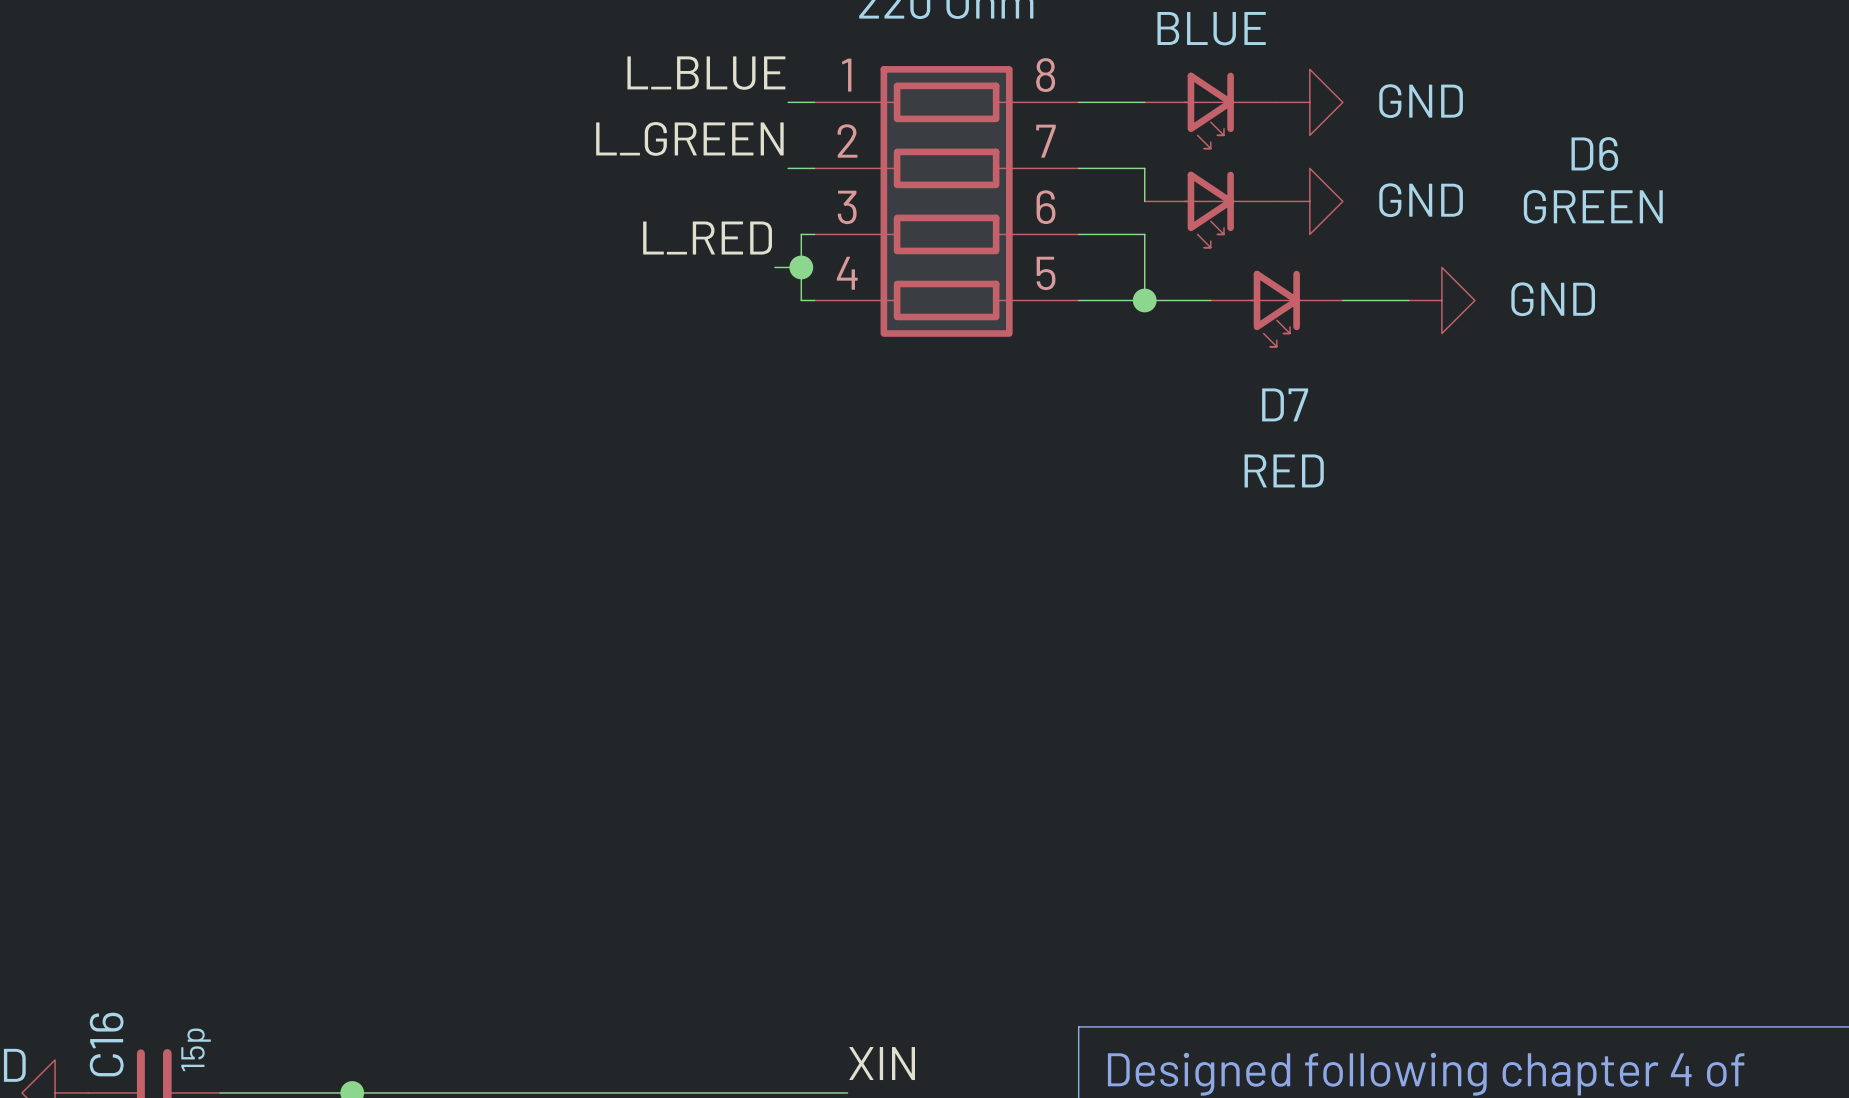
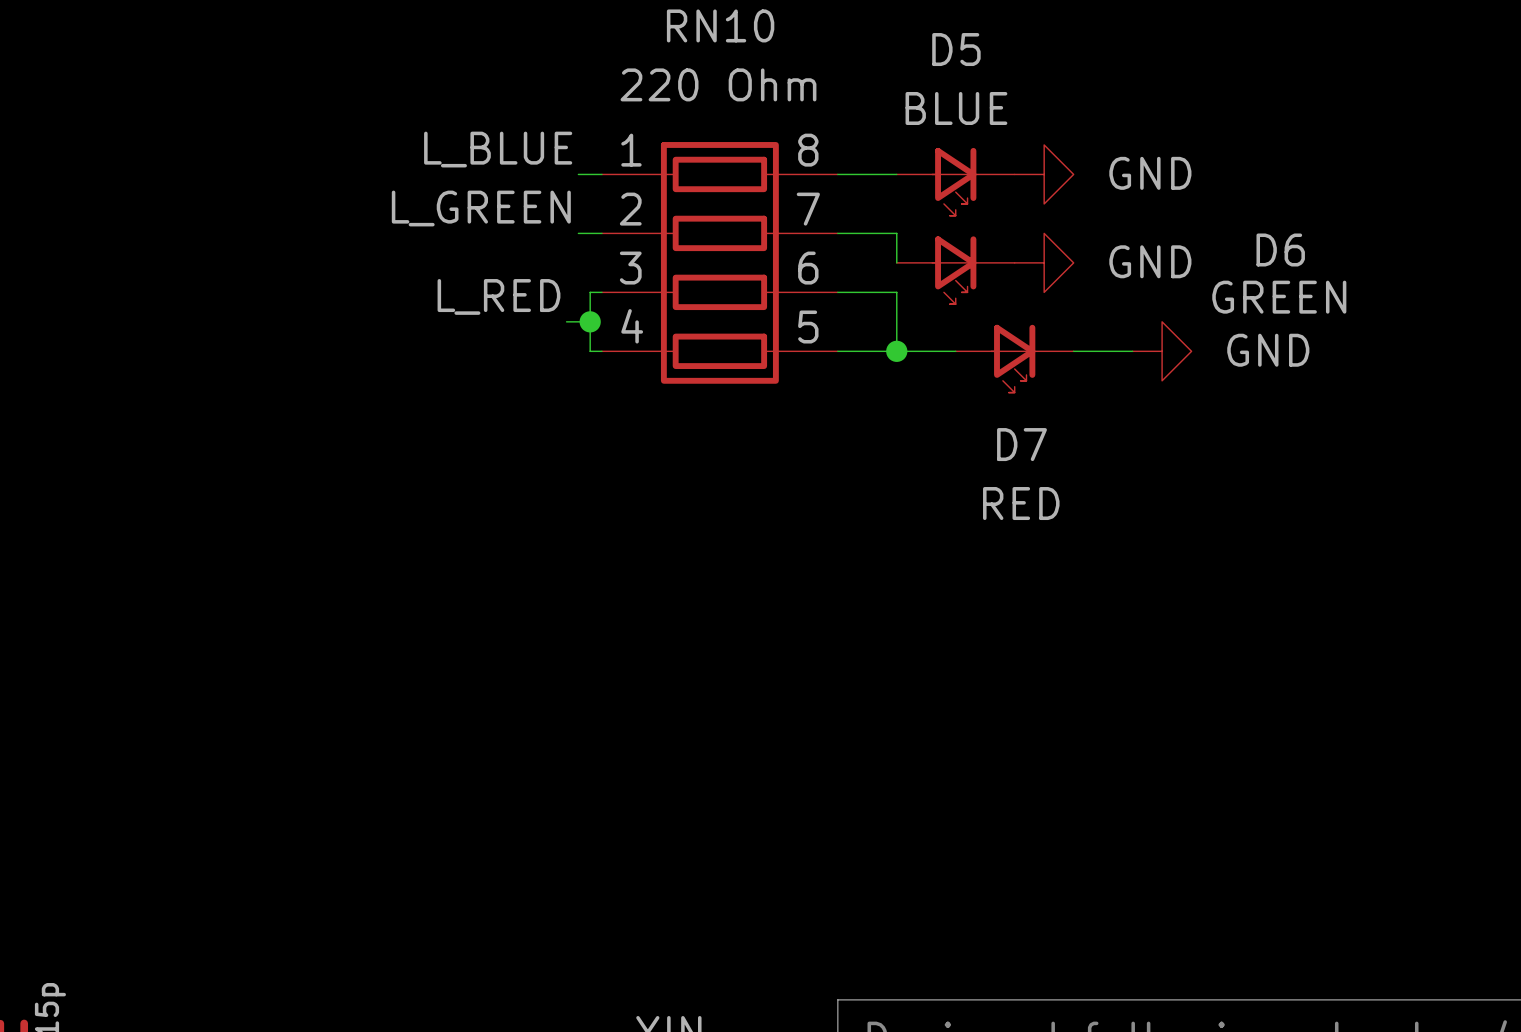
D6 name position: D6 (1594, 153) -> D6 (1280, 249)
D6 value position: GREEN (1593, 206) -> GREEN (1279, 297)

